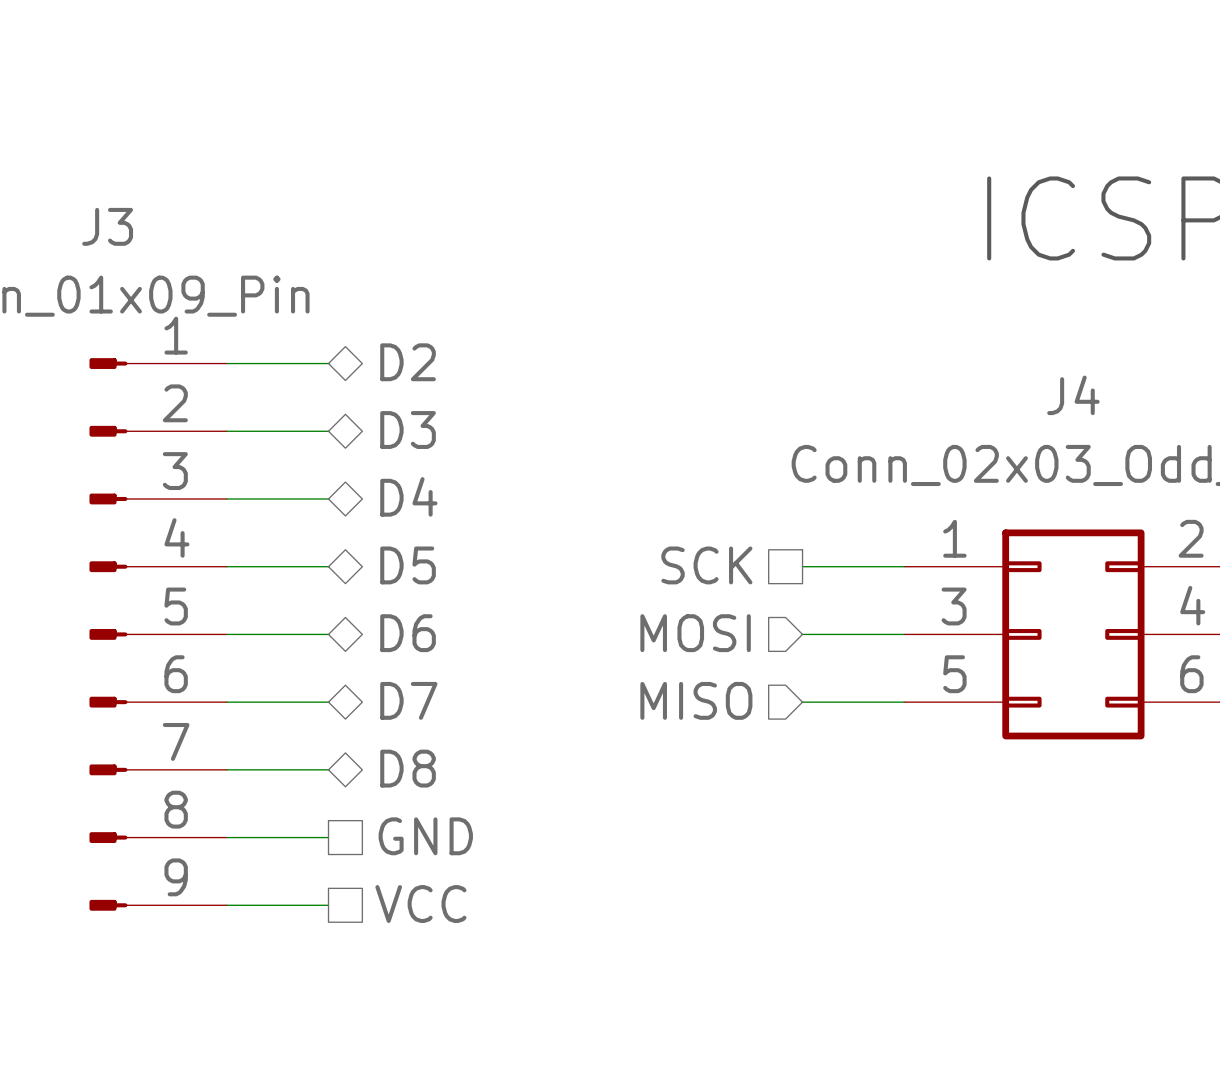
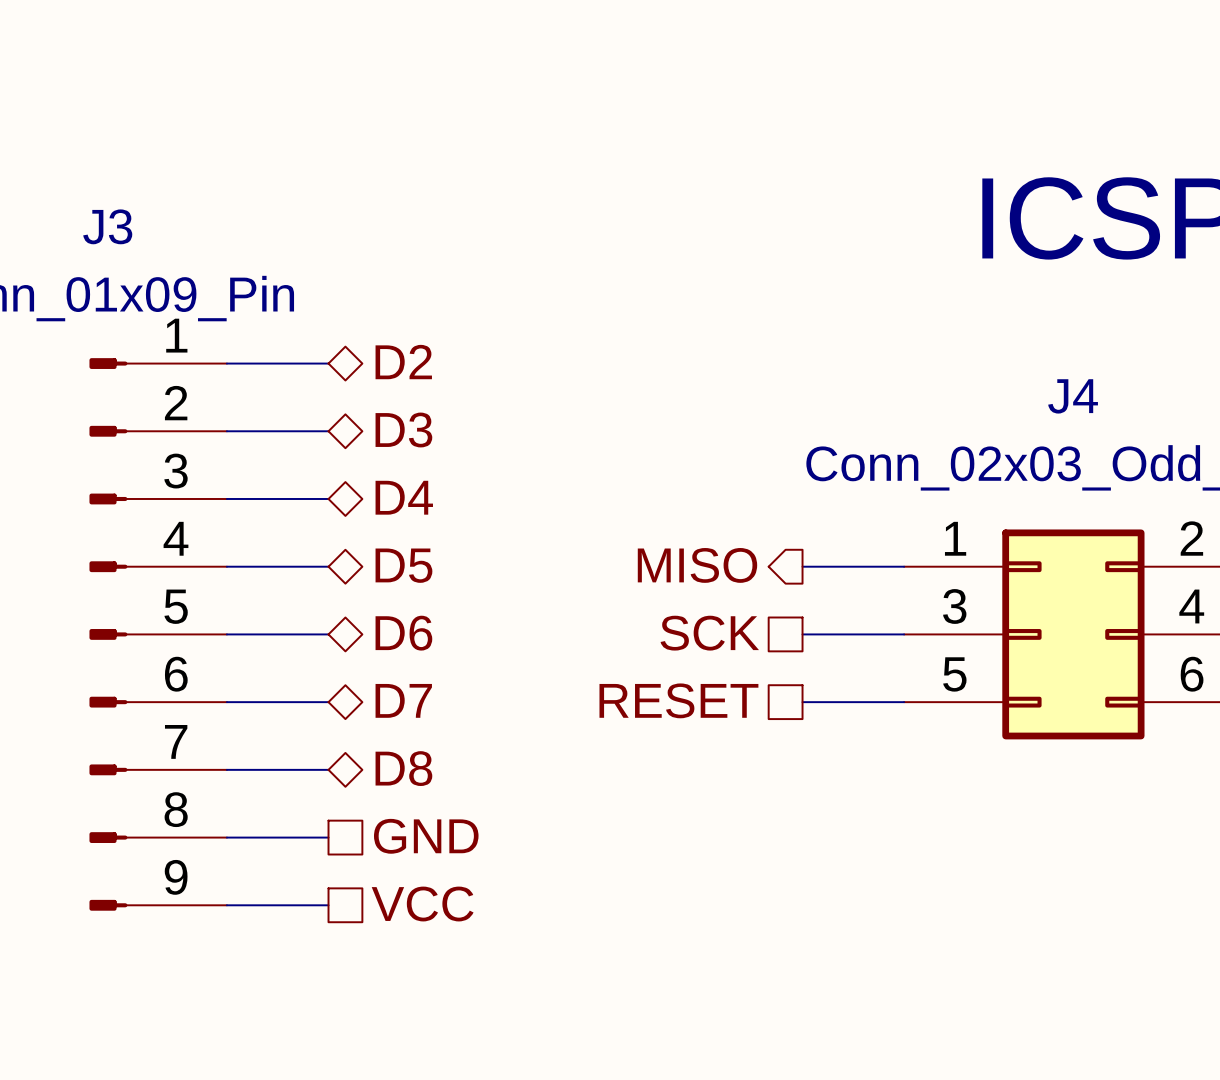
hierarchical label shape: passive (706, 565) -> output (697, 565)
hierarchical label: SCK (706, 565) -> MISO (697, 565)
hierarchical label shape: input (695, 633) -> passive (709, 633)
hierarchical label: MOSI (695, 633) -> SCK (709, 633)
hierarchical label shape: input (696, 700) -> passive (678, 700)
hierarchical label: MISO (696, 700) -> RESET (678, 700)

